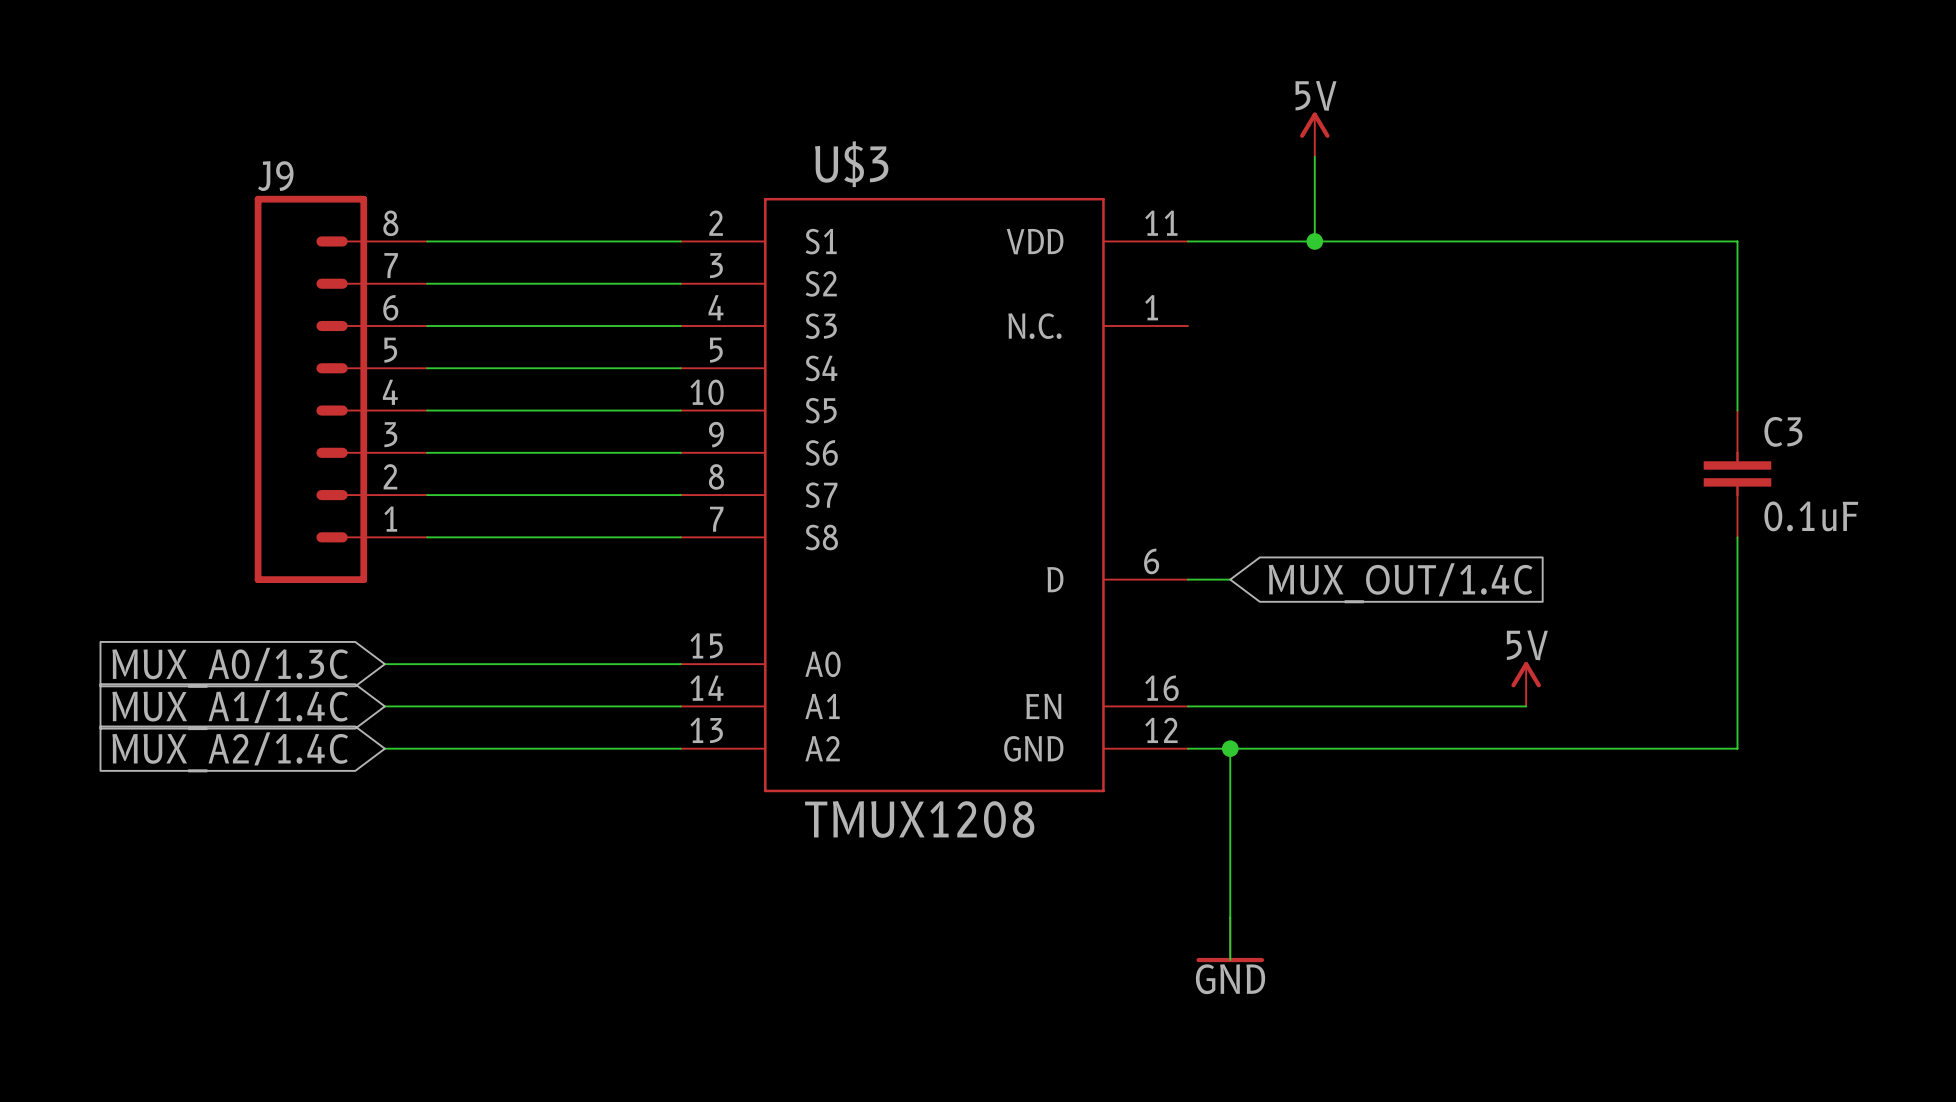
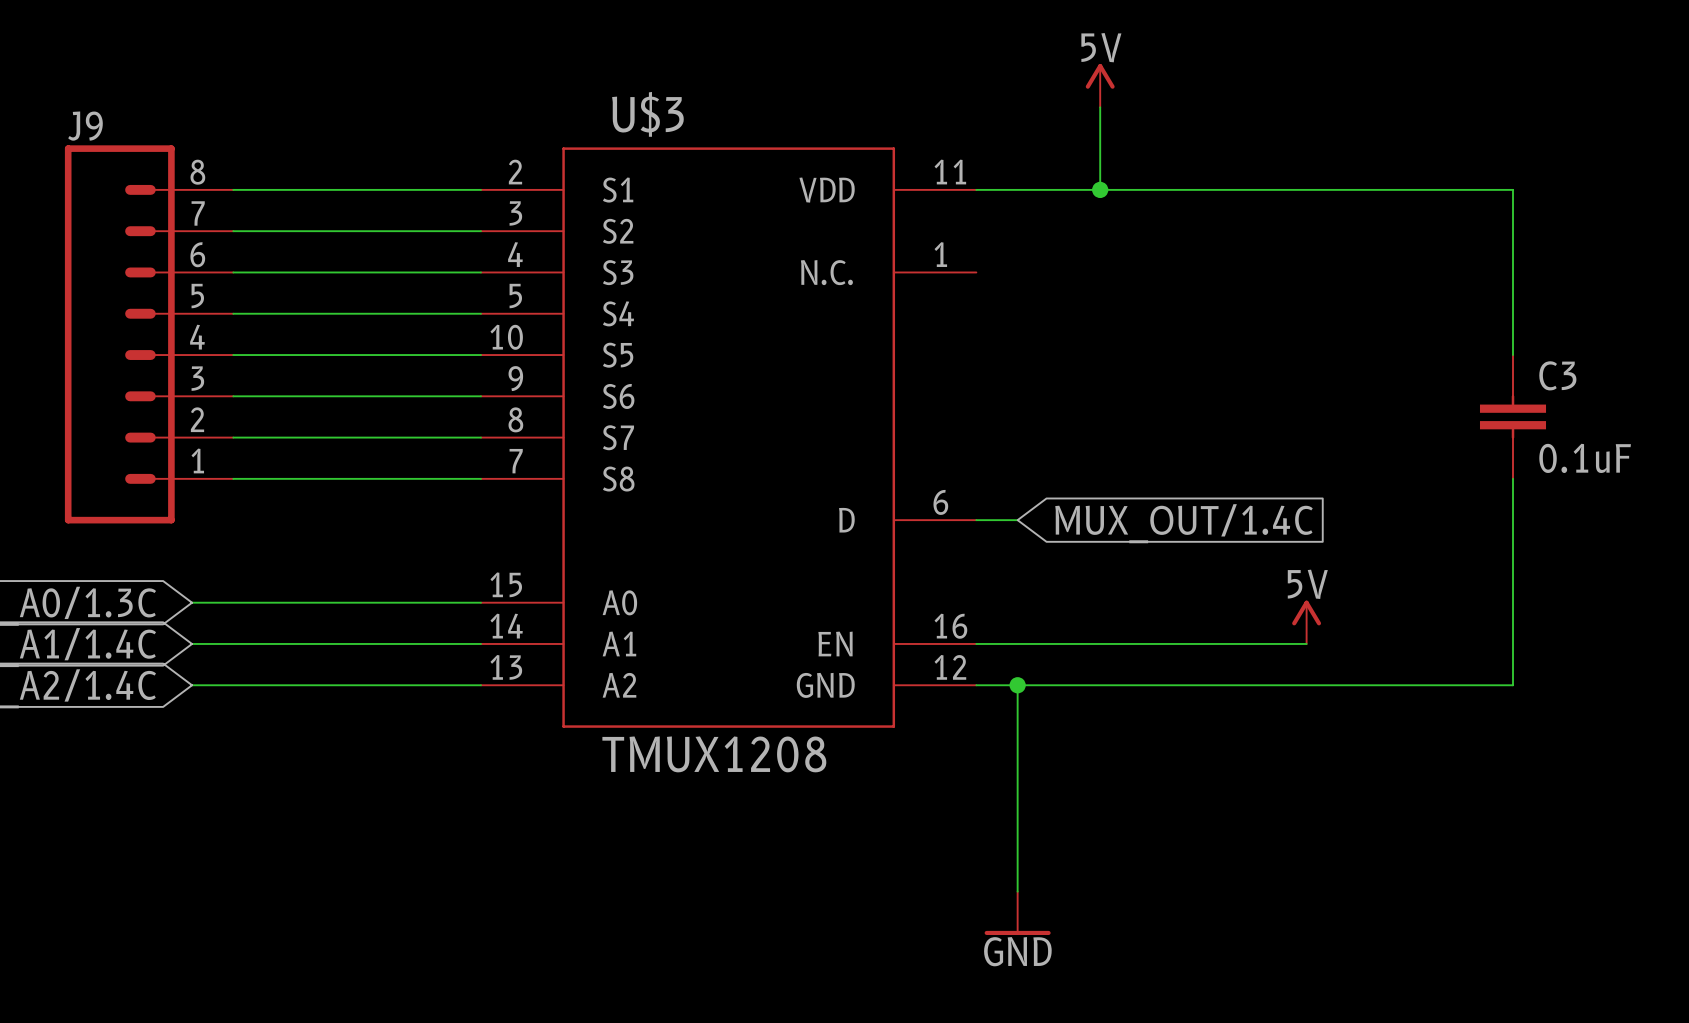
power symbol position: GND (1230, 939) -> GND (1017, 913)

